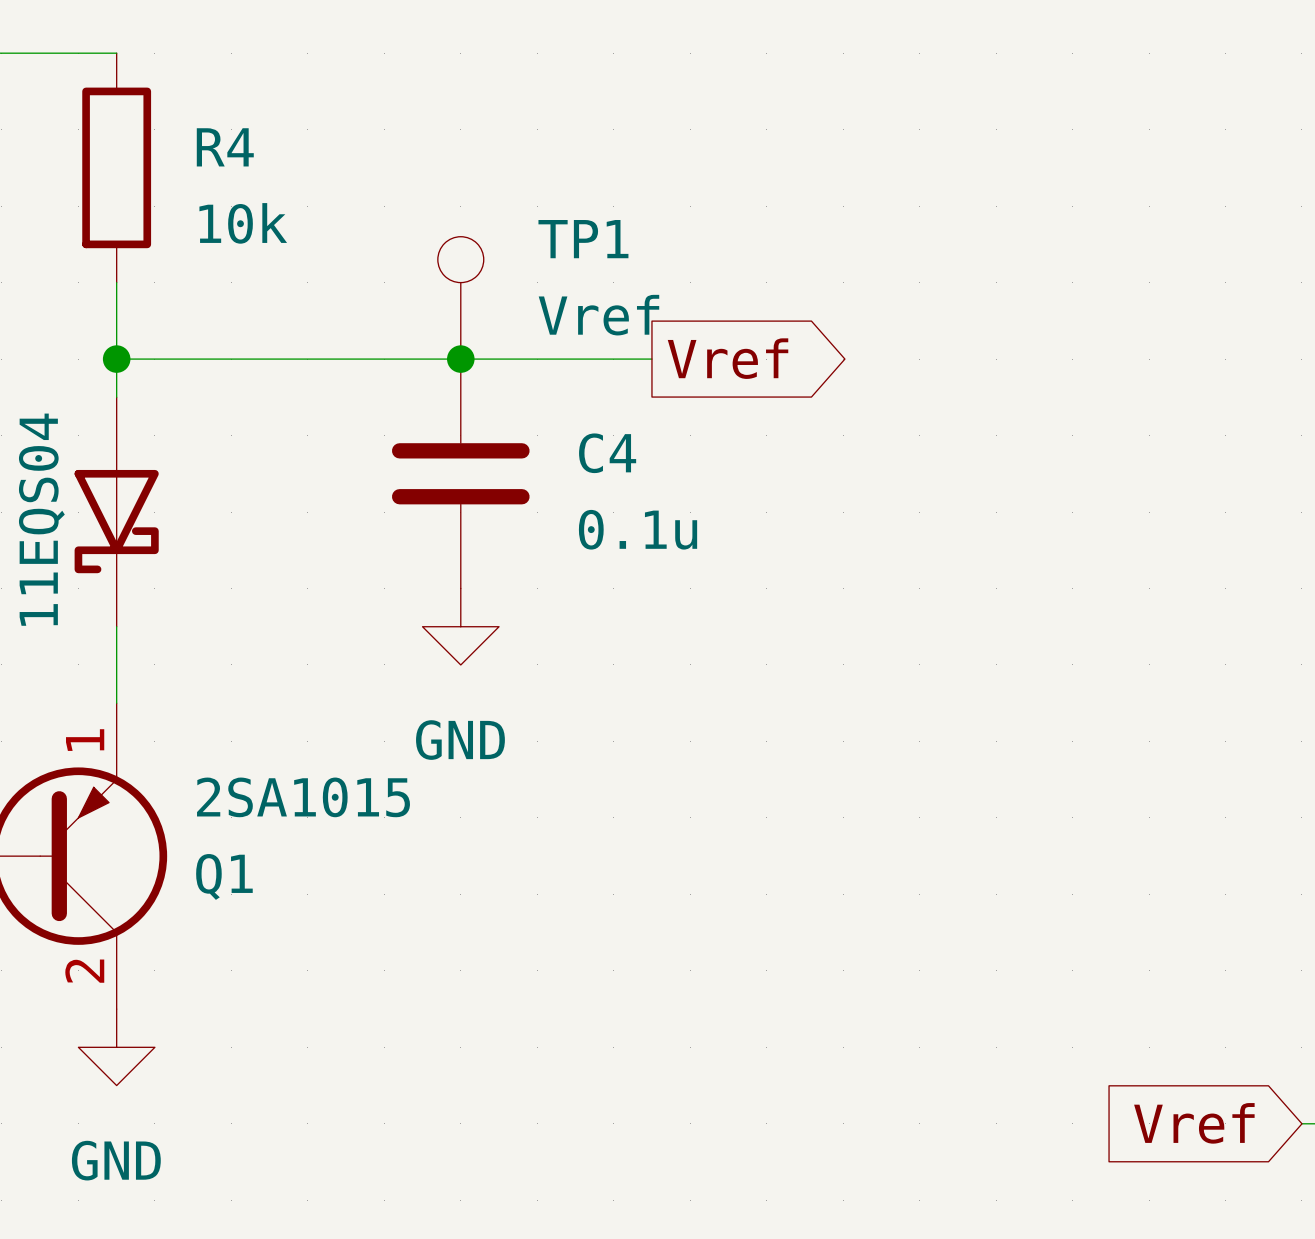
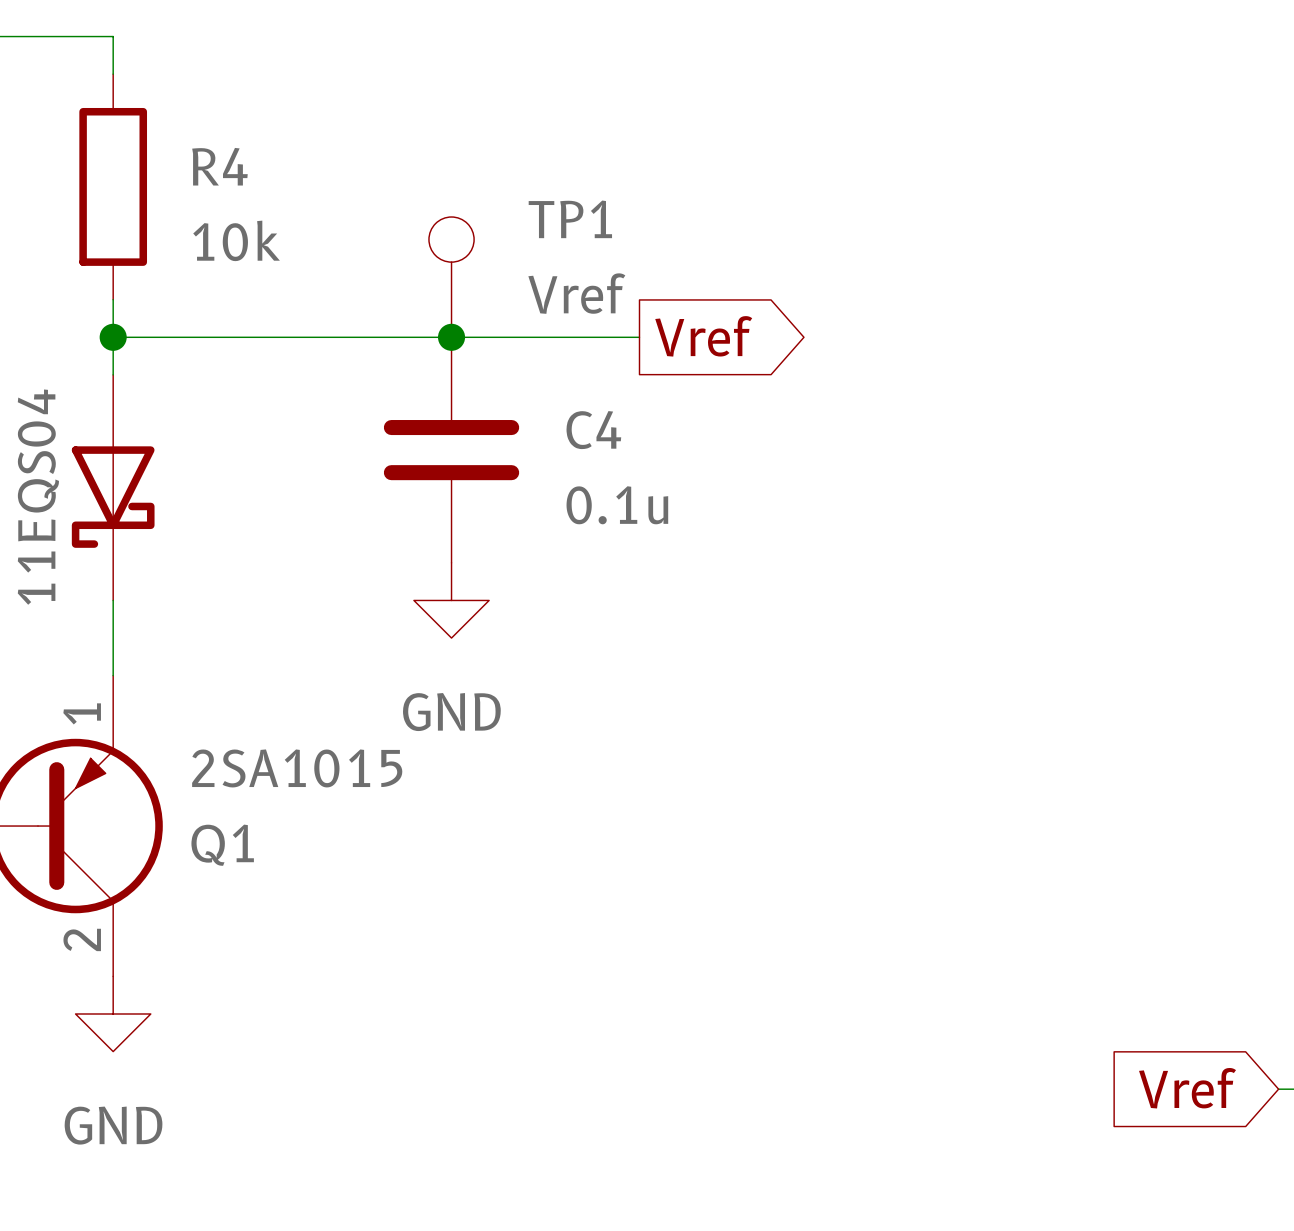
R4 position: (116, 167) -> (113, 186)

